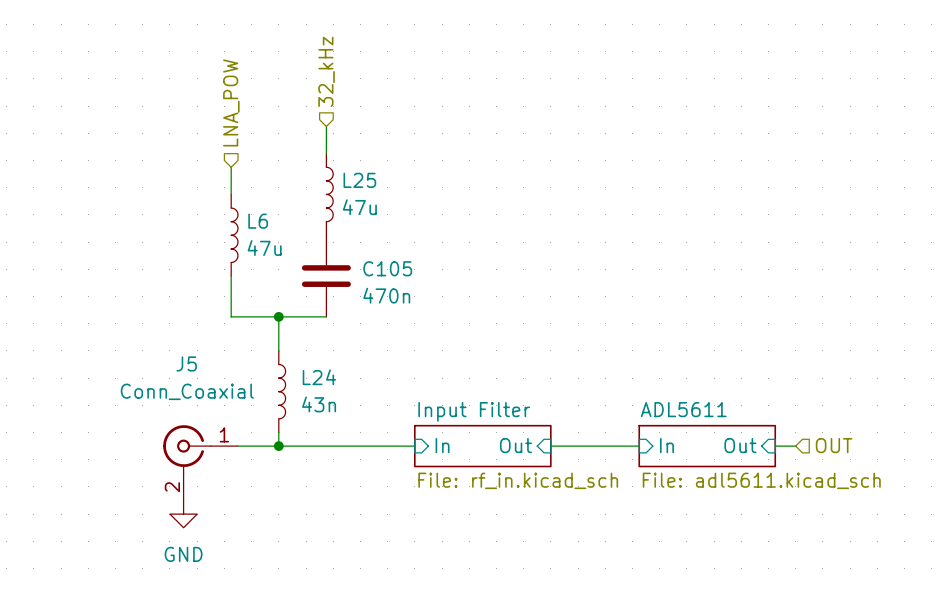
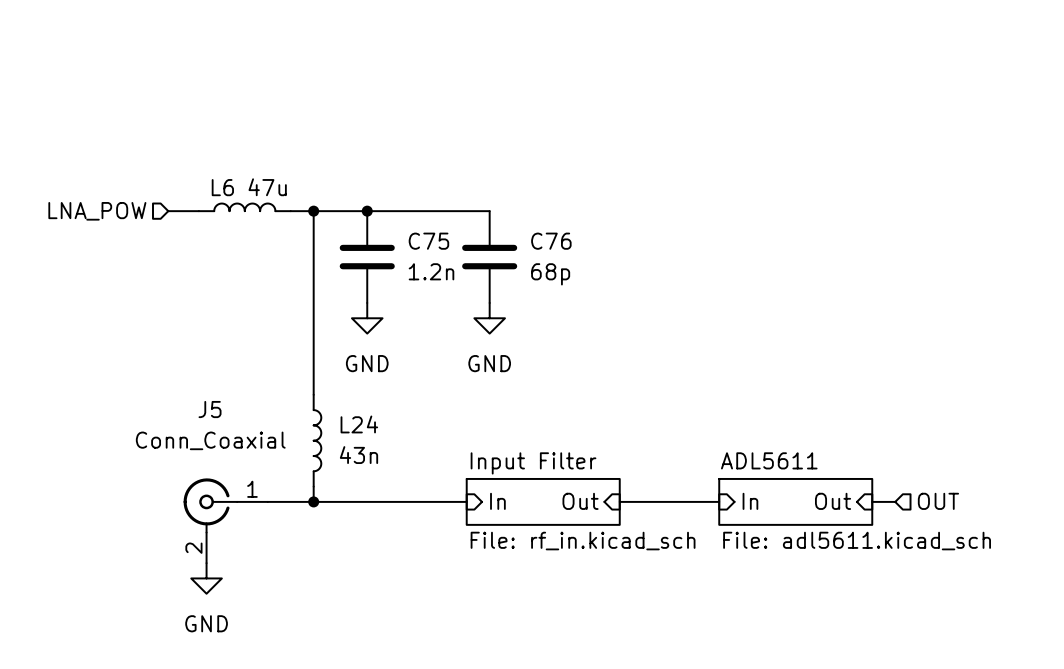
hierarchical label: 32_kHz (326, 71) -> none
hierarchical label rotation: 0° (231, 102) -> 90° counterclockwise (97, 211)
hierarchical label position: LNA_POW (231, 102) -> LNA_POW (97, 211)
wire: (326, 126) (326, 153) -> none
wire: (231, 167) (231, 194) -> none
wire: none -> (168, 211) (198, 211)
wire: none -> (290, 211) (489, 211)
wire: none -> (313, 211) (313, 356)
junction: none -> (313, 211)
junction: none -> (367, 211)
L25: 47u (329, 194) -> none
C75: none -> 1.2n (367, 257)
C76: none -> 68p (489, 257)
L6 rotation: 0° (234, 235) -> 90° counterclockwise (244, 207)
L6 position: (234, 235) -> (244, 207)
wire: (231, 276) (231, 316) (326, 316) -> none
C105: 470n (326, 276) -> none
power symbol: none -> GND (367, 318)
power symbol: none -> GND (489, 318)
junction: (278, 316) -> none

